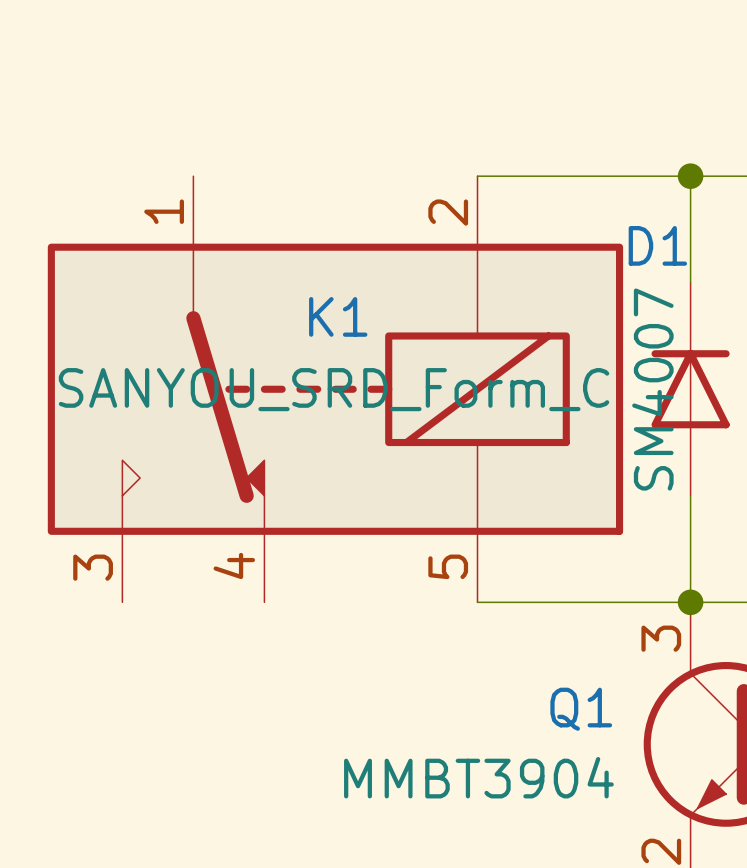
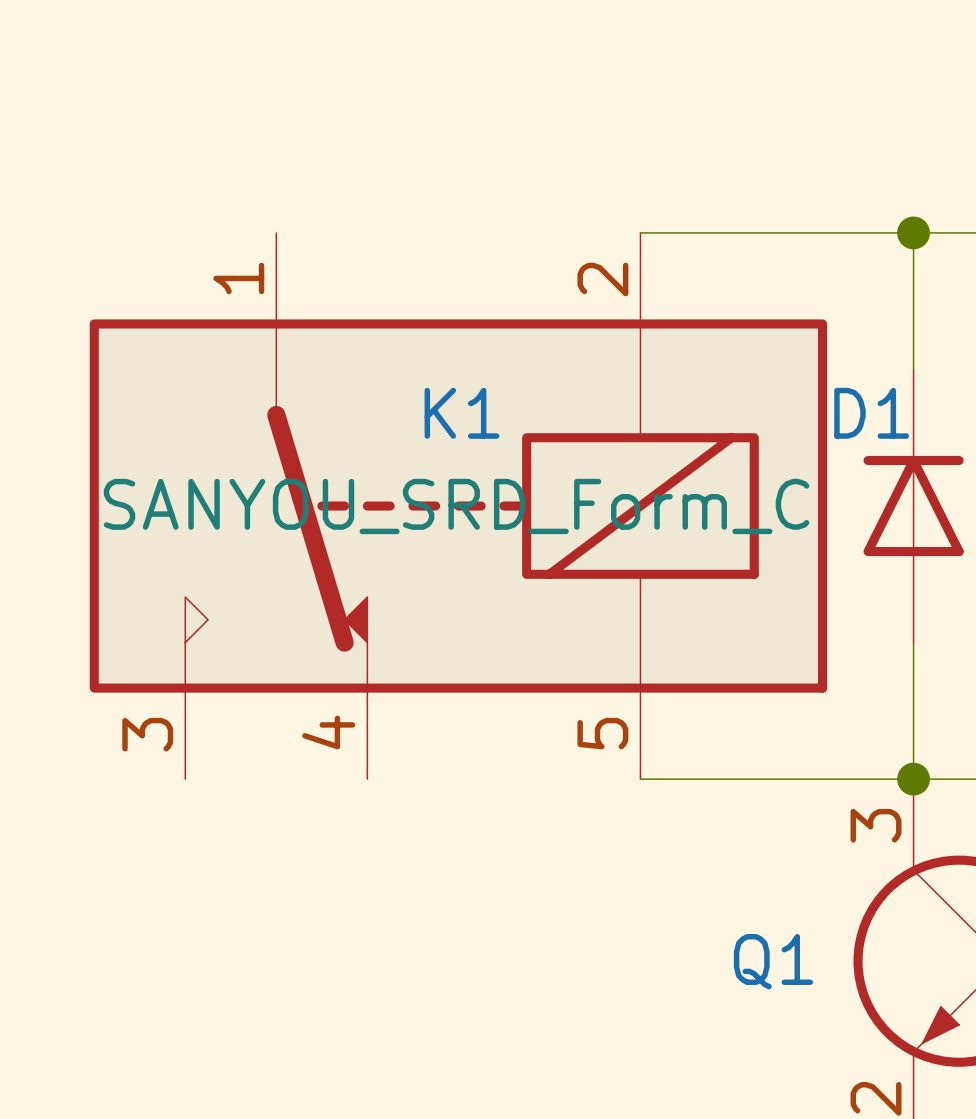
D1 name position: D1 (657, 245) -> D1 (871, 413)
D1 value: SM4007 (652, 389) -> none
Q1 name position: Q1 (581, 709) -> Q1 (773, 961)
Q1 value: MMBT3904 (478, 777) -> none

